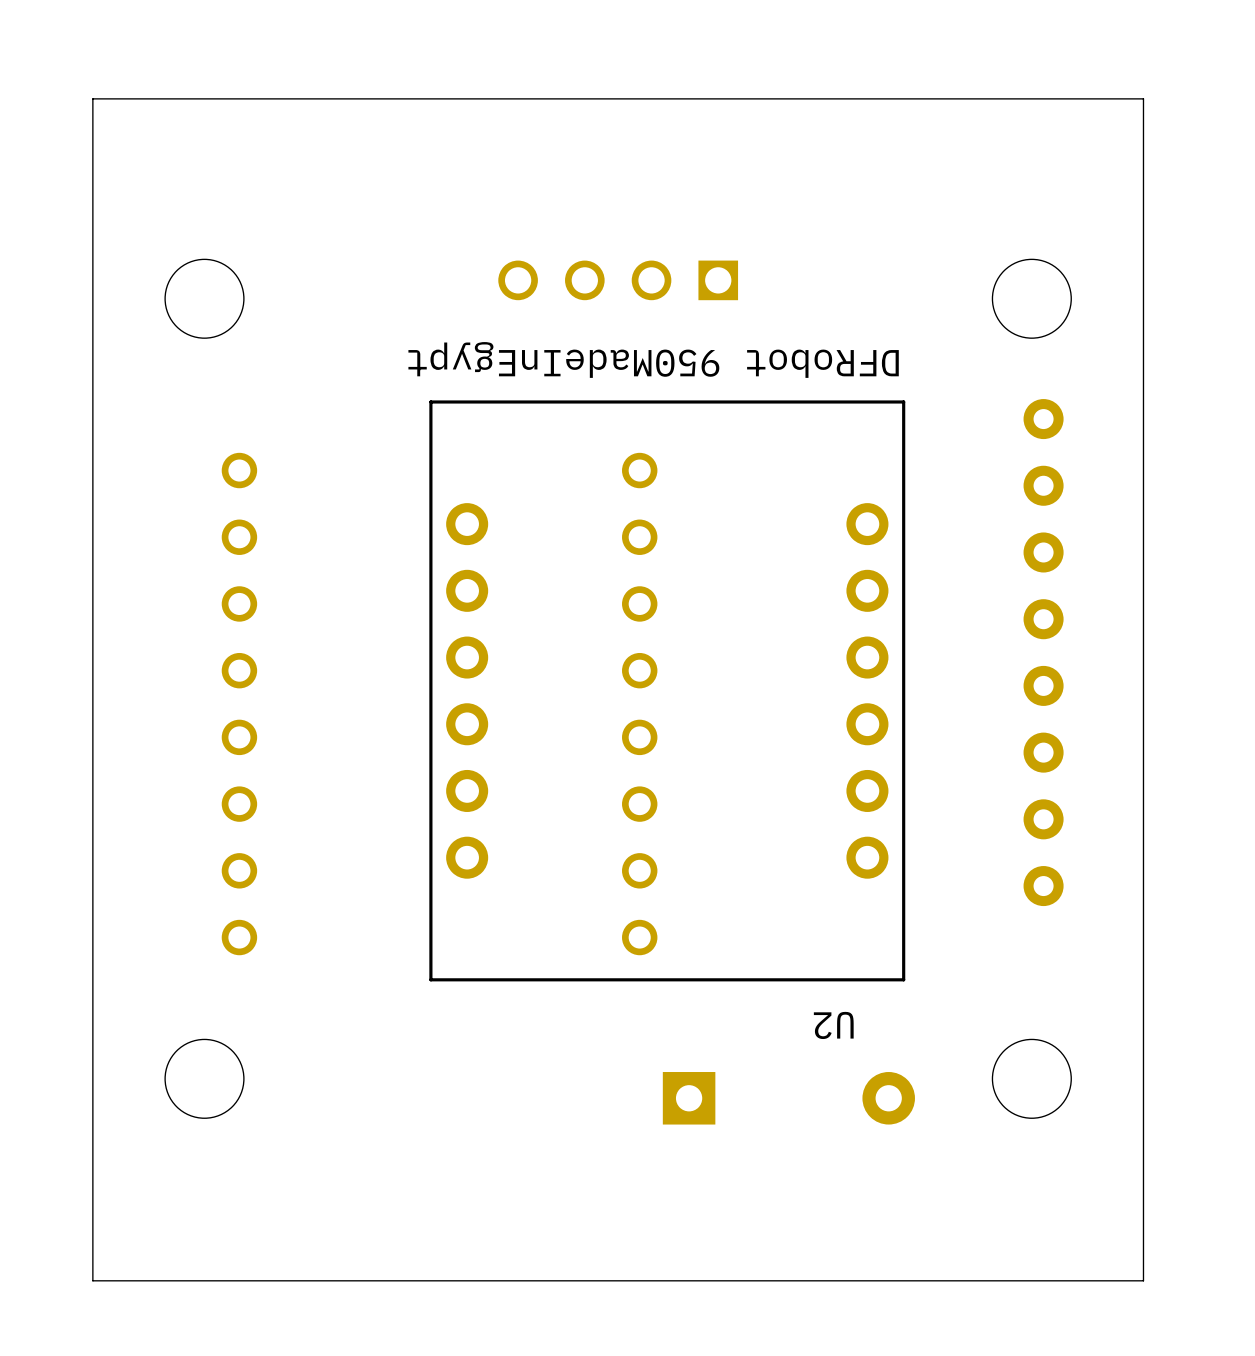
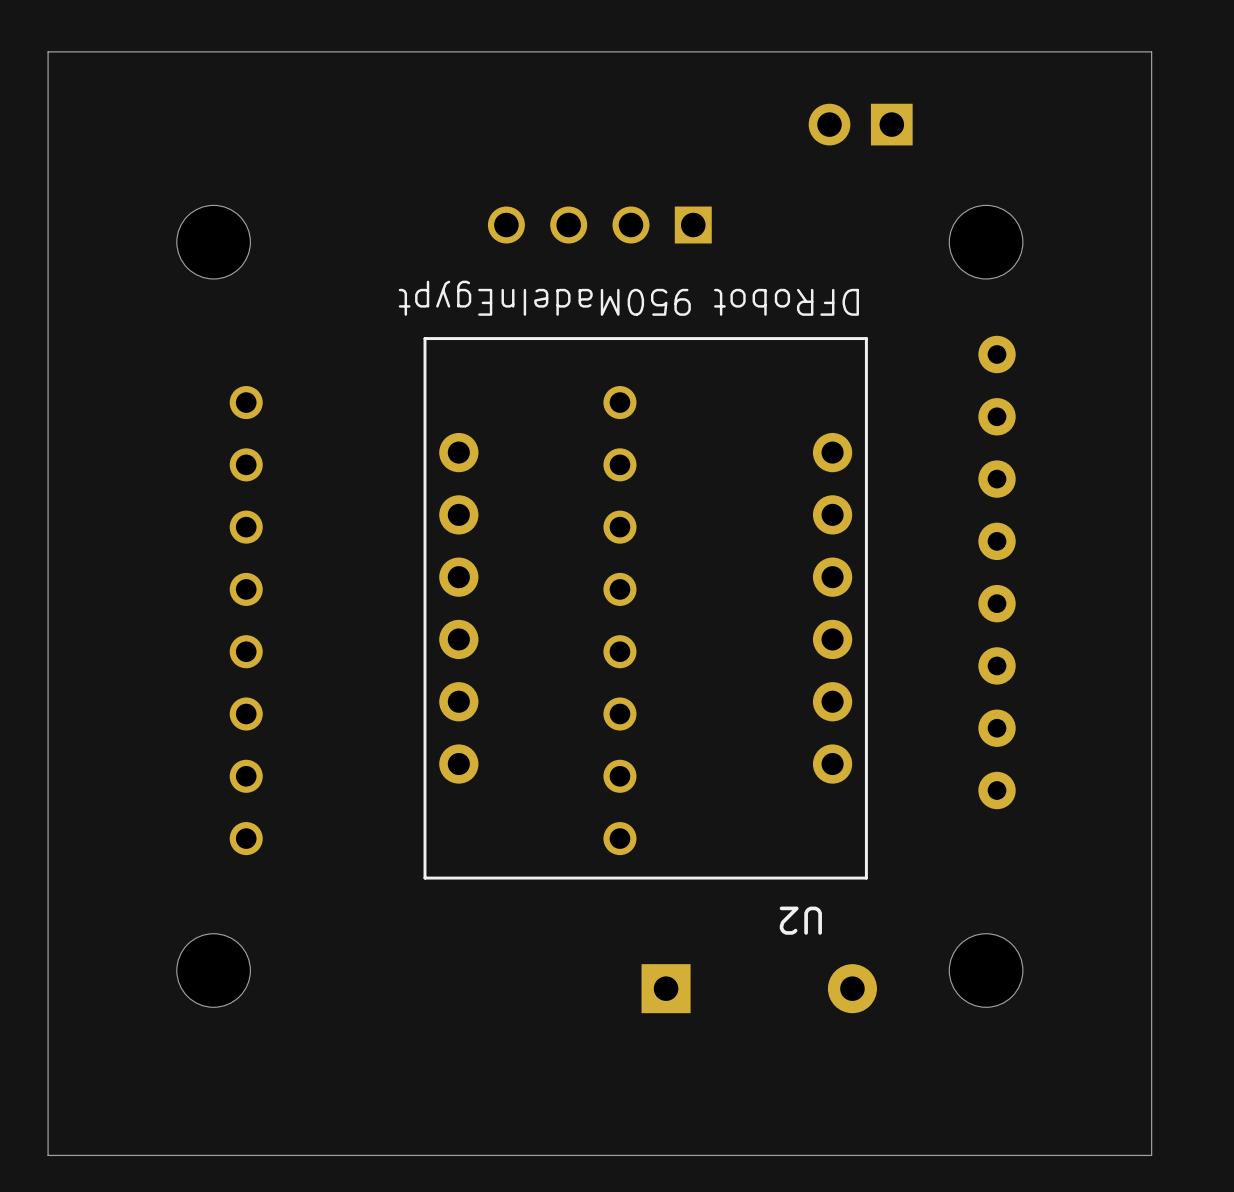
board edge: (1143, 98) (92, 98) (92, 1280) (1143, 1280) (1143, 98) -> (1151, 51) (1151, 1155) (48, 1155) (48, 51) (1151, 51)
part: none -> (860, 124)

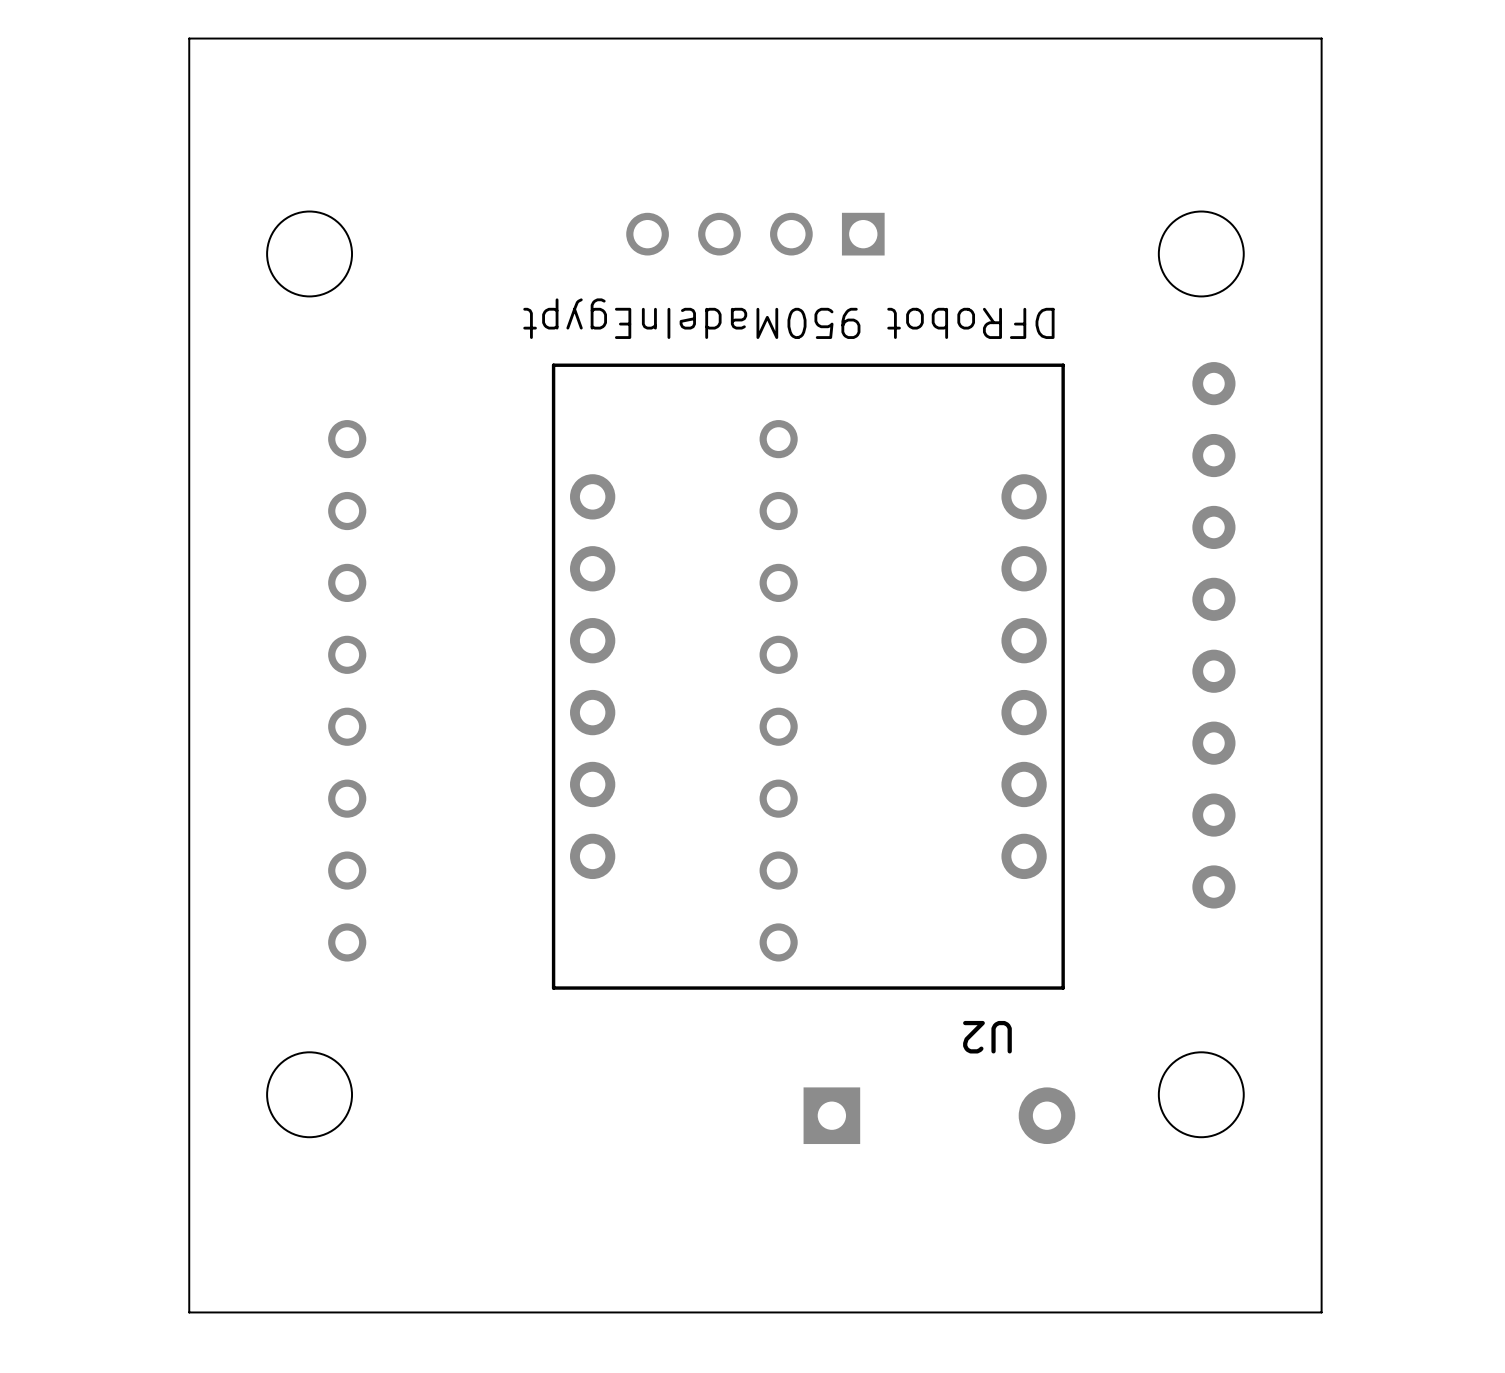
board edge: (1151, 51) (48, 51) (48, 1155) (1151, 1155) (1151, 51) -> (1321, 38) (1321, 1312) (189, 1312) (189, 38) (1321, 38)
part: (860, 124) -> none

